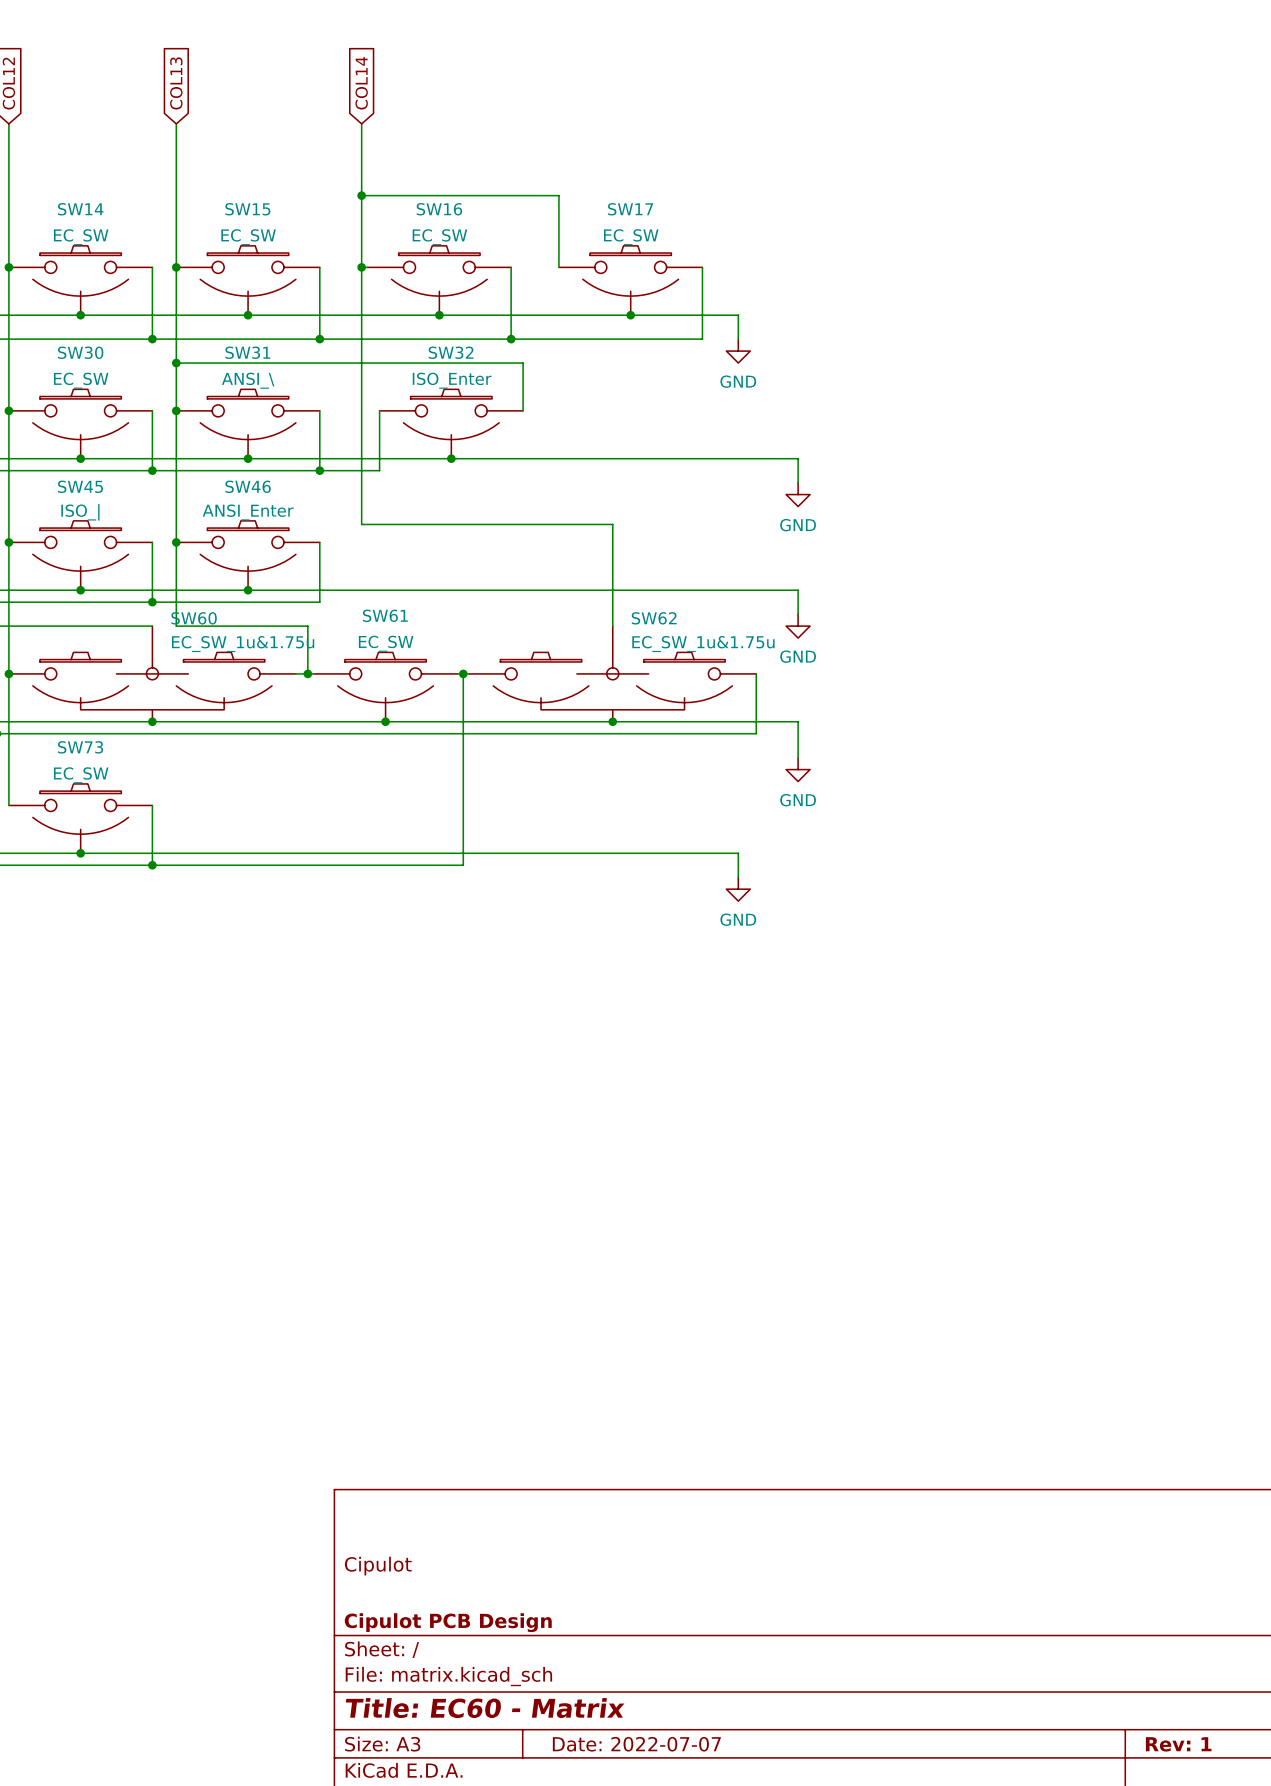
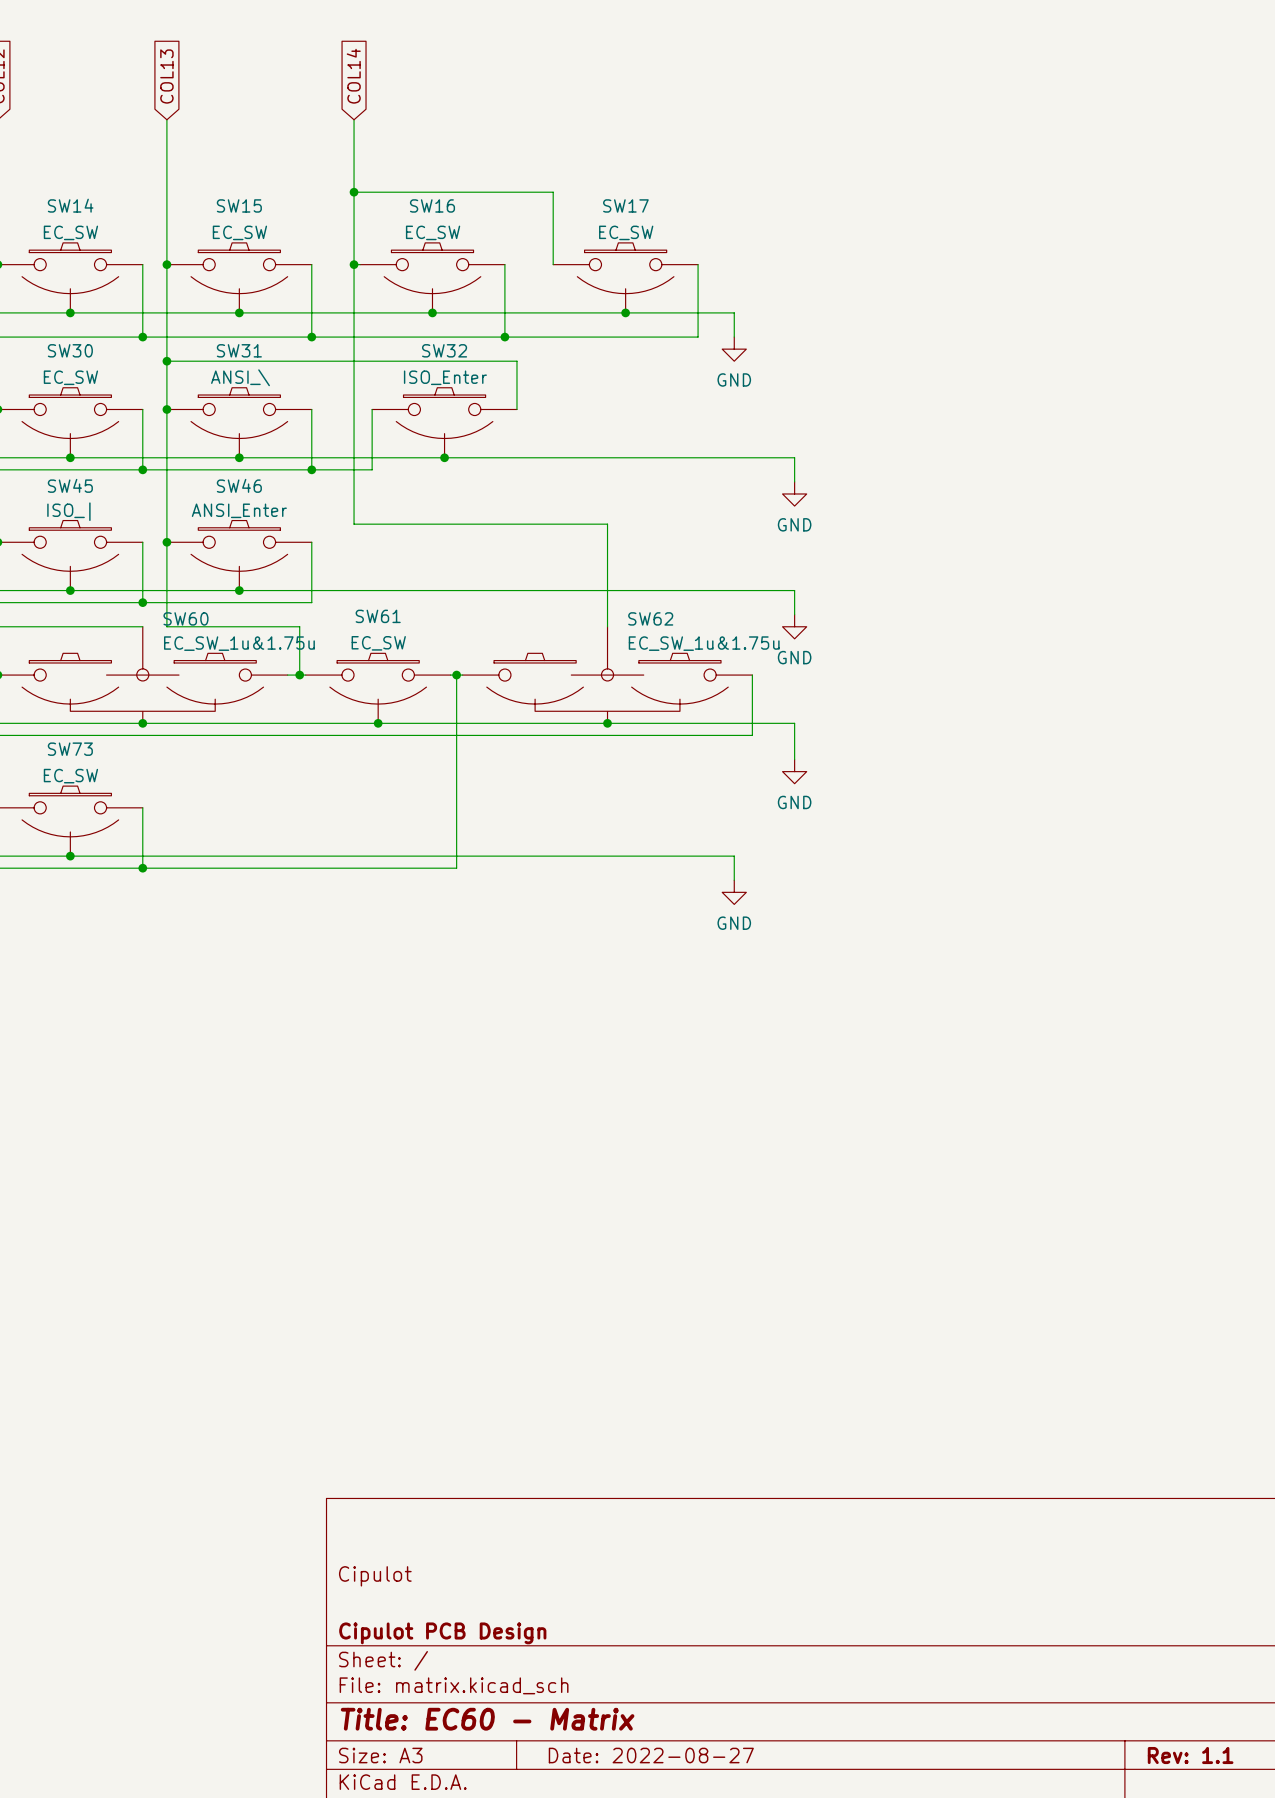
title block: Date: 2022-07-07 (636, 1744) -> Date: 2022-08-27 (651, 1755)
title block: Rev: 1 (1178, 1744) -> Rev: 1.1 (1190, 1755)

